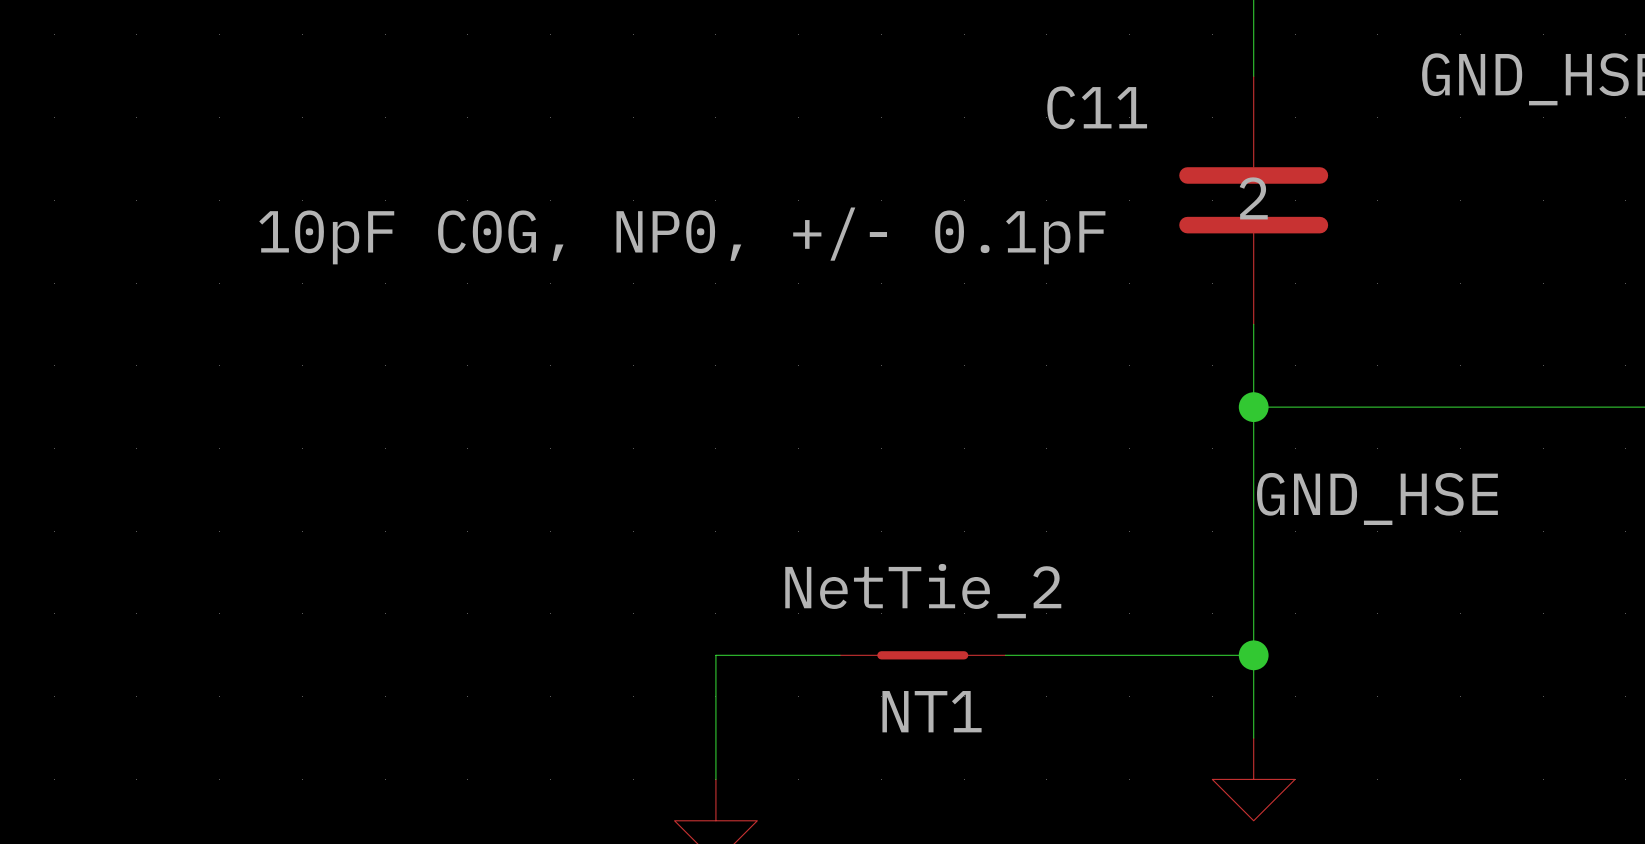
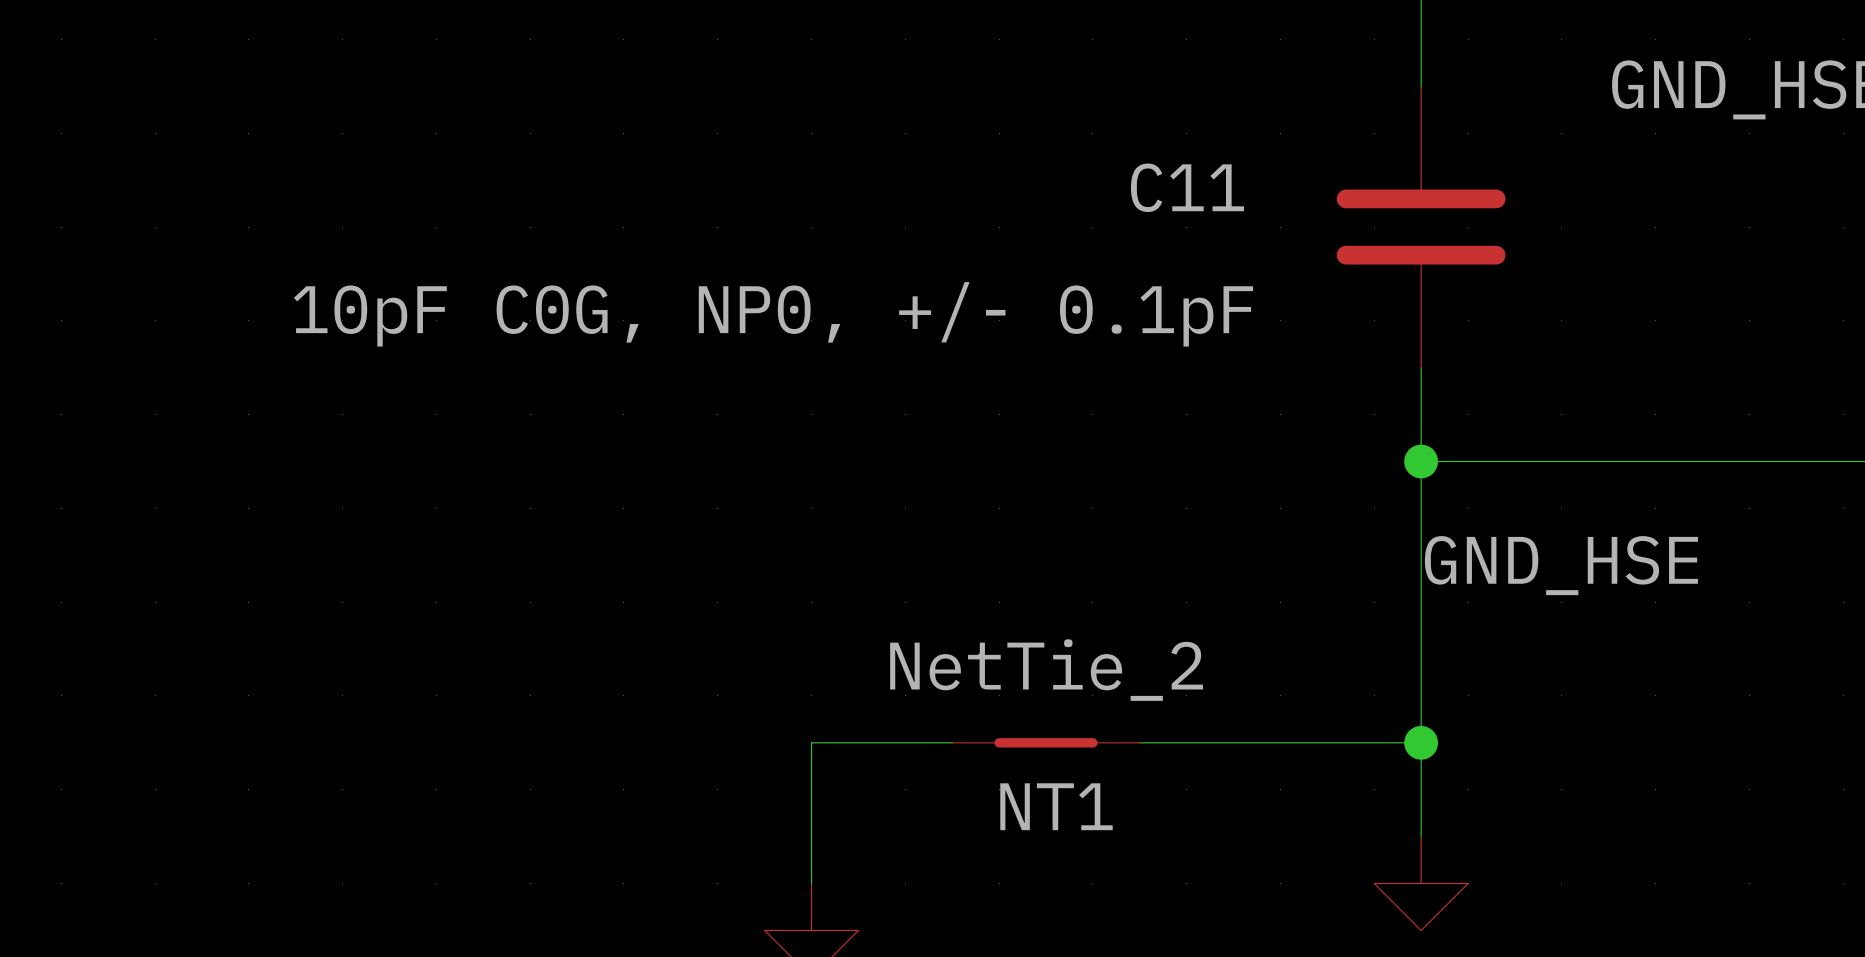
C11 name position: C11 (1097, 107) -> C11 (1187, 187)
C11 text: 2 (1253, 198) -> none
C11 value position: 10pF C0G, NP0, +/- 0.1pF (682, 235) -> 10pF C0G, NP0, +/- 0.1pF (773, 314)

